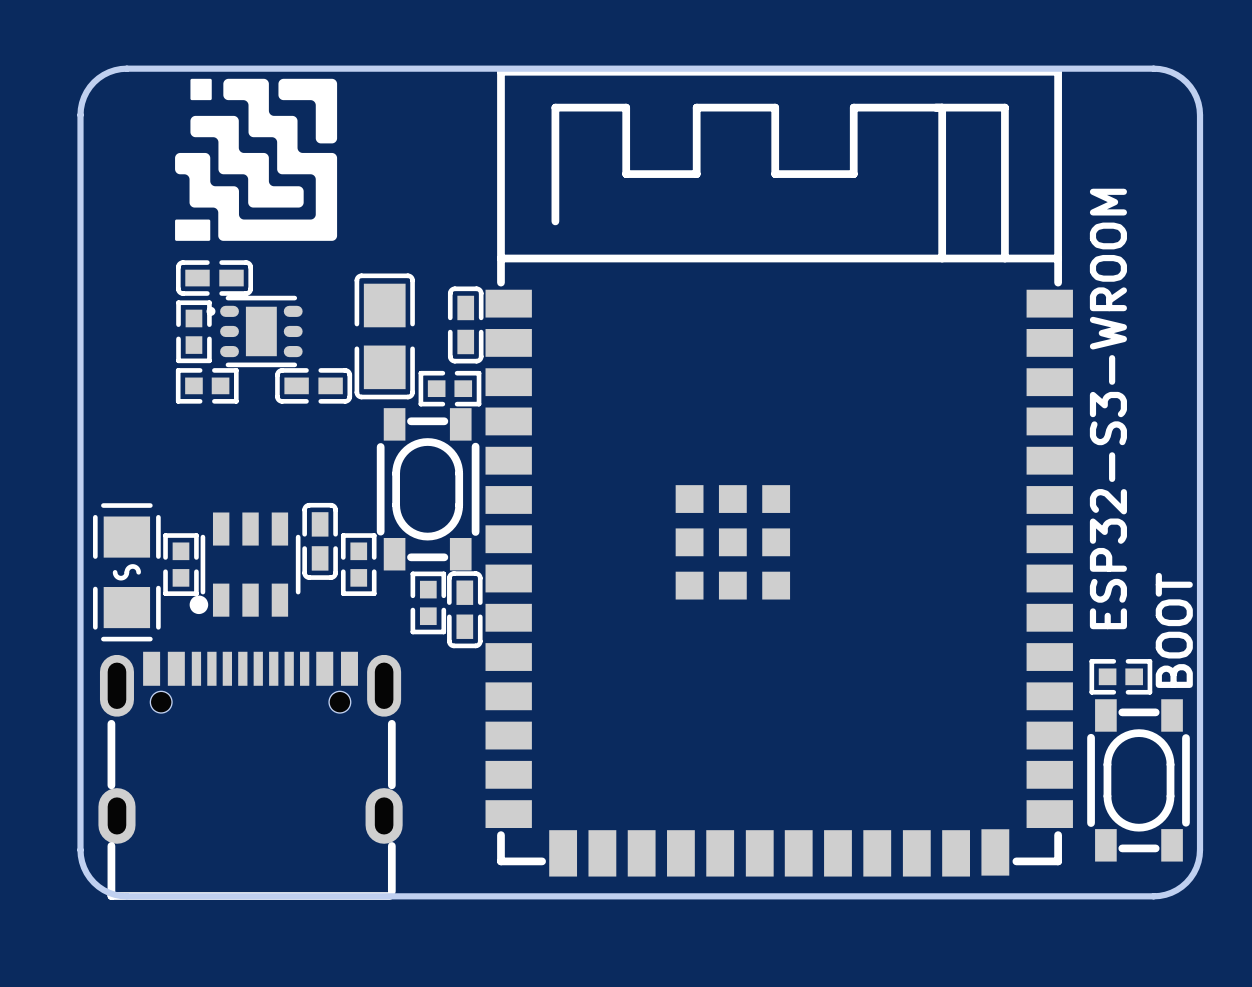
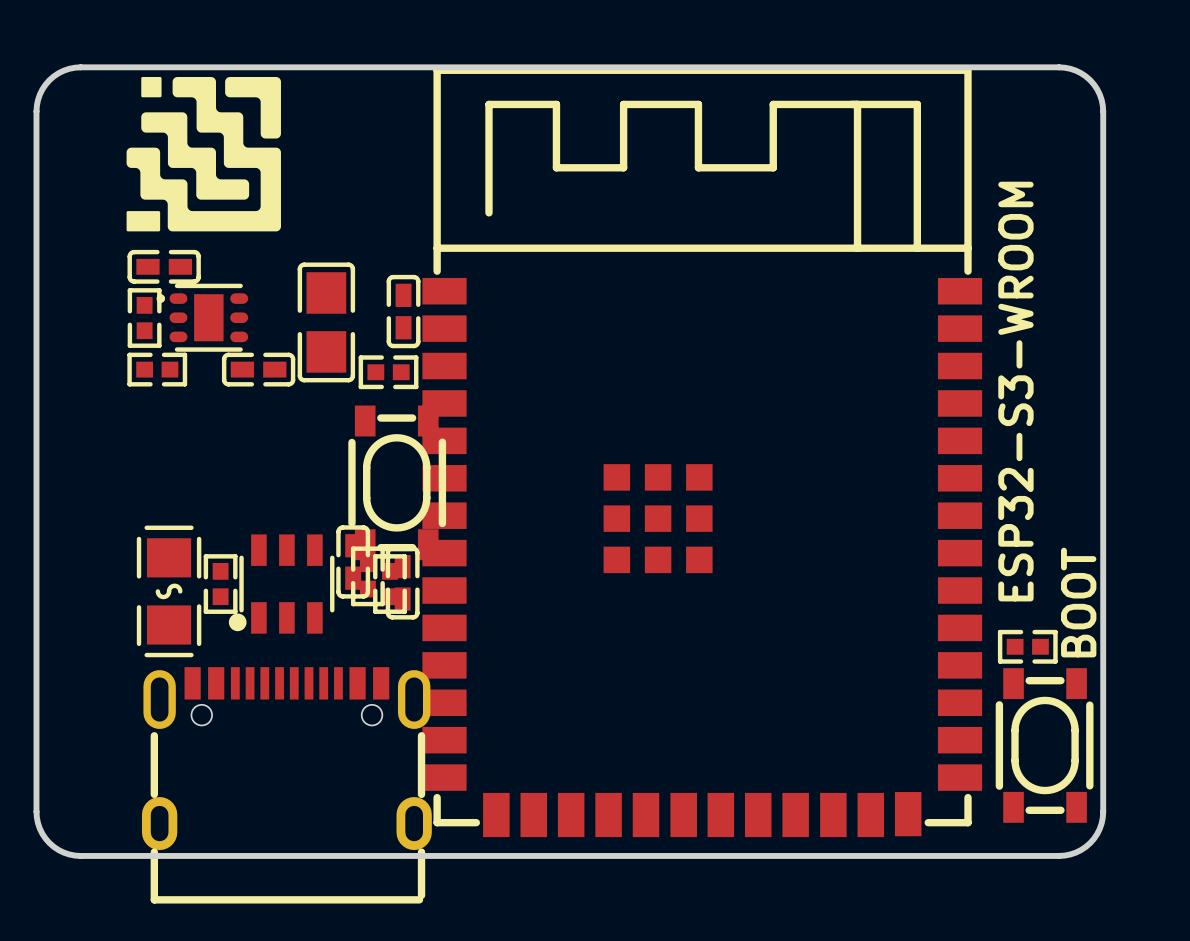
part position: (428, 489) -> (397, 482)
part position: (320, 541) -> (353, 561)
part: (180, 564) -> none
part position: (245, 564) -> (281, 584)
part: (358, 564) -> none
part position: (126, 572) -> (169, 591)
part: none -> (220, 584)
part: none -> (390, 584)
part position: (250, 775) -> (286, 785)

